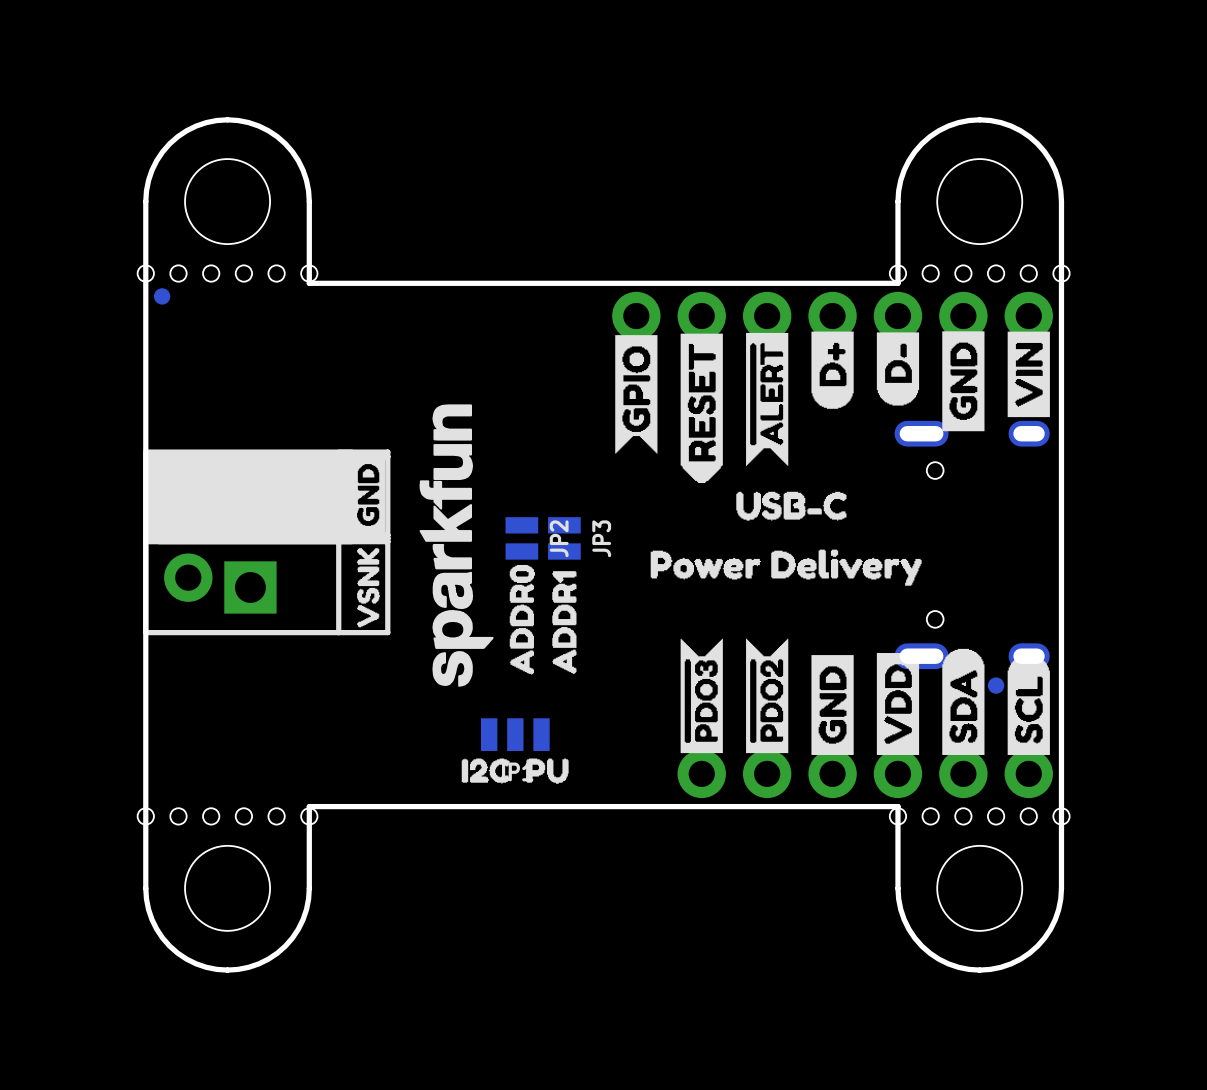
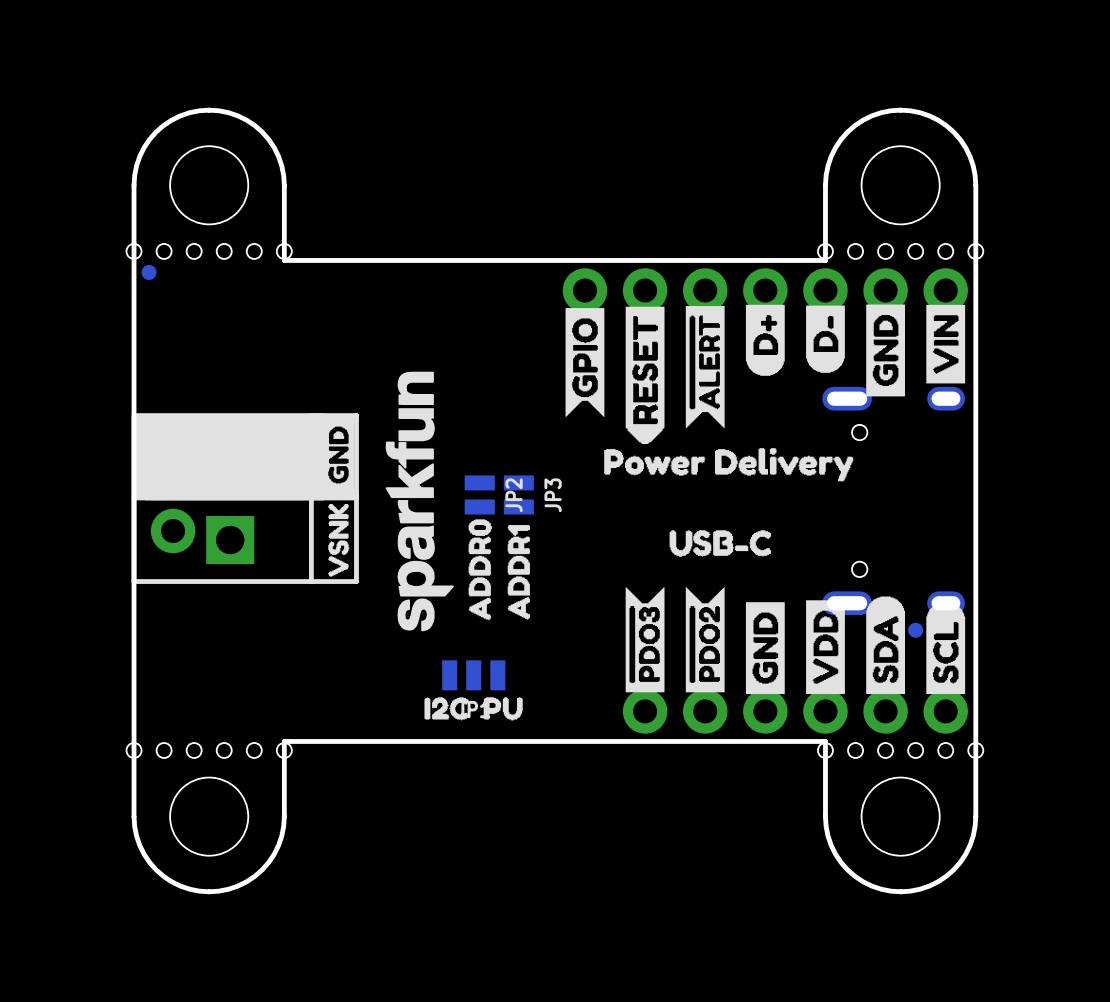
drawing position: (791, 506) -> (720, 543)
drawing position: (786, 567) -> (728, 464)

